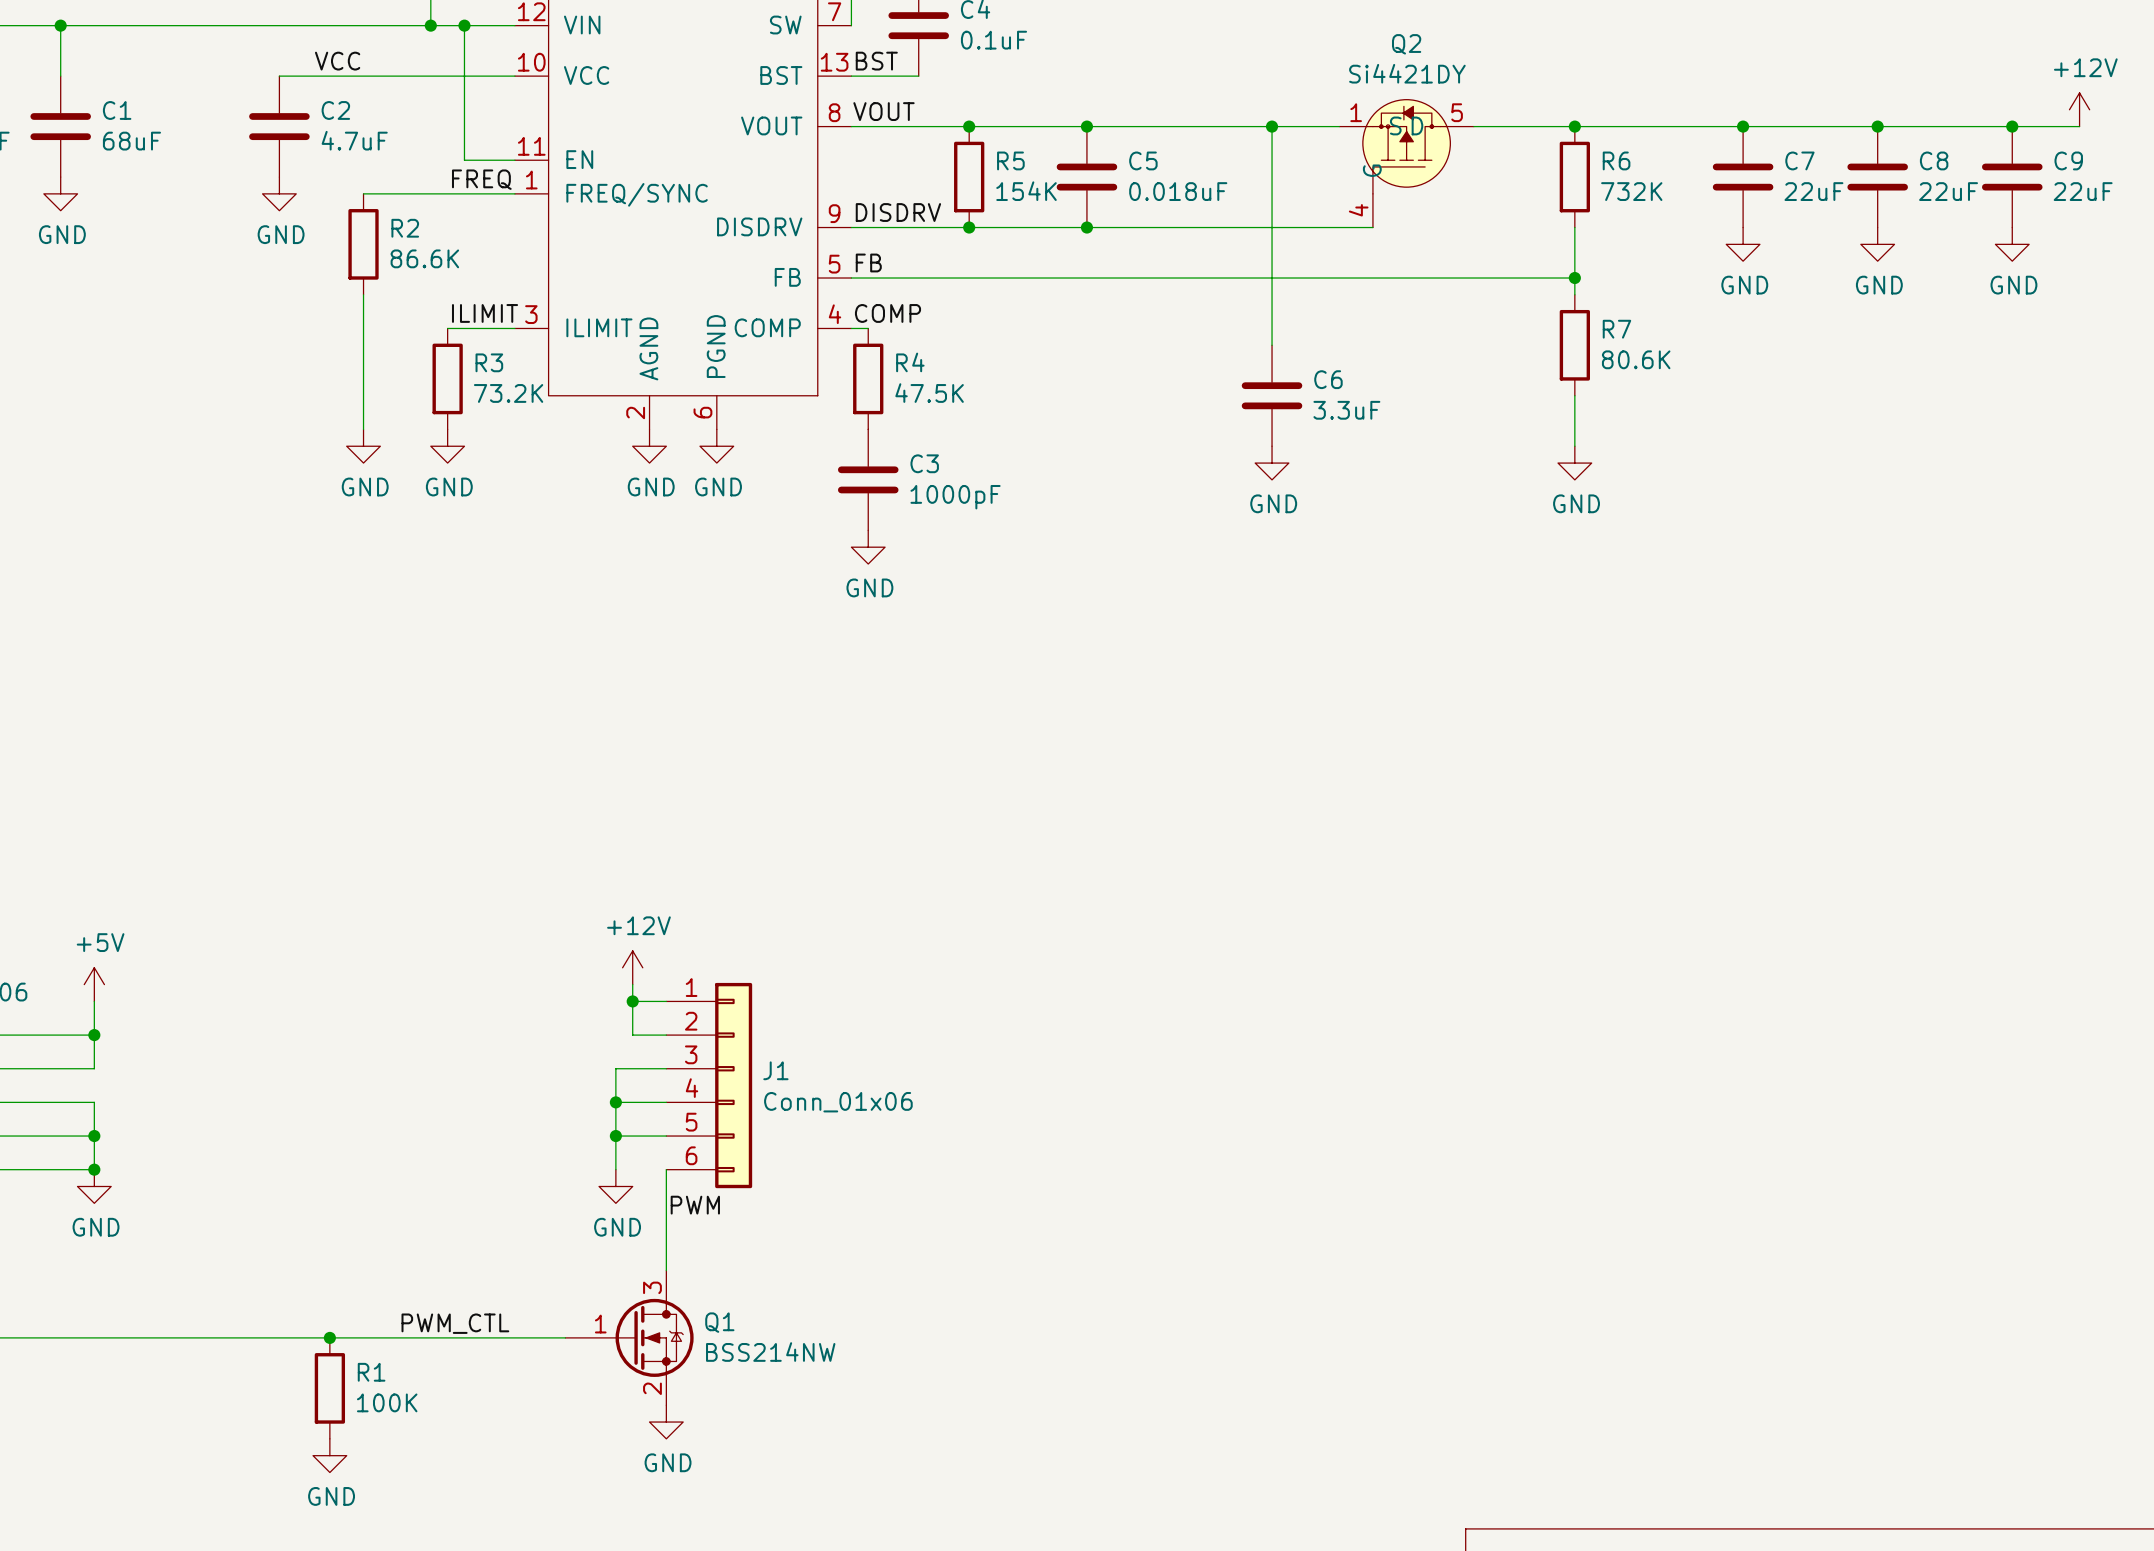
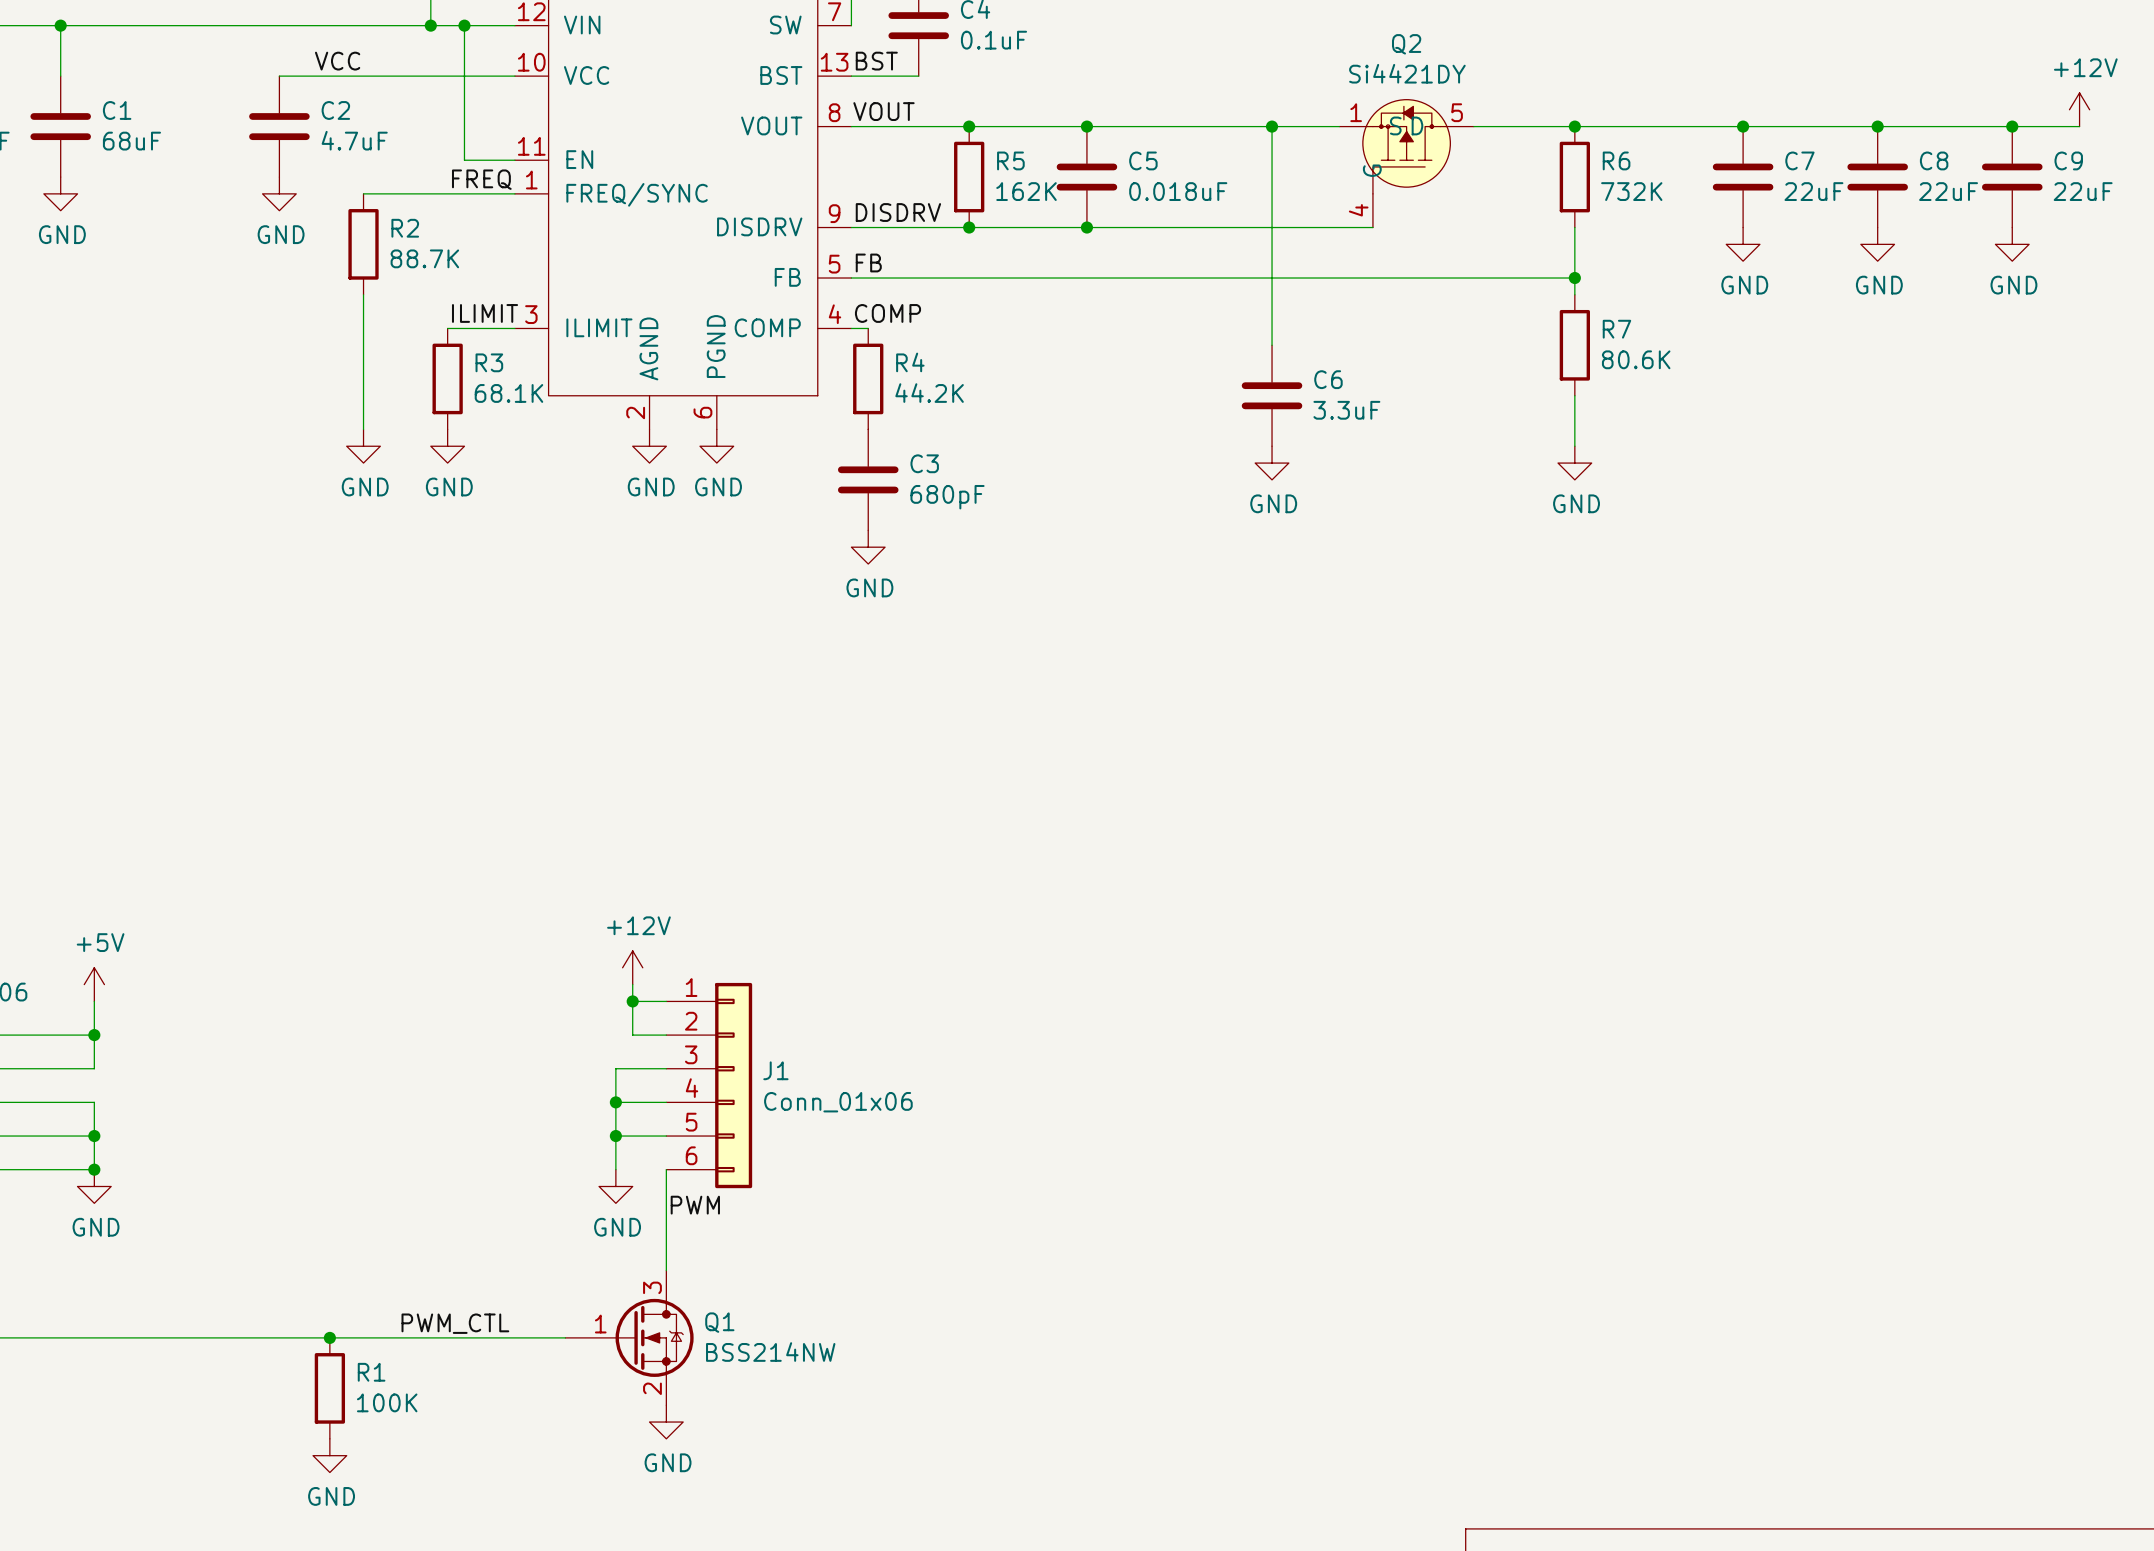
R5 value: 154K (1026, 191) -> 162K (1026, 191)
R2 value: 86.6K (424, 258) -> 88.7K (424, 258)
R3 value: 73.2K (508, 393) -> 68.1K (508, 393)
R4 value: 47.5K (929, 393) -> 44.2K (929, 393)
C3 value: 1000pF (955, 497) -> 680pF (947, 497)

